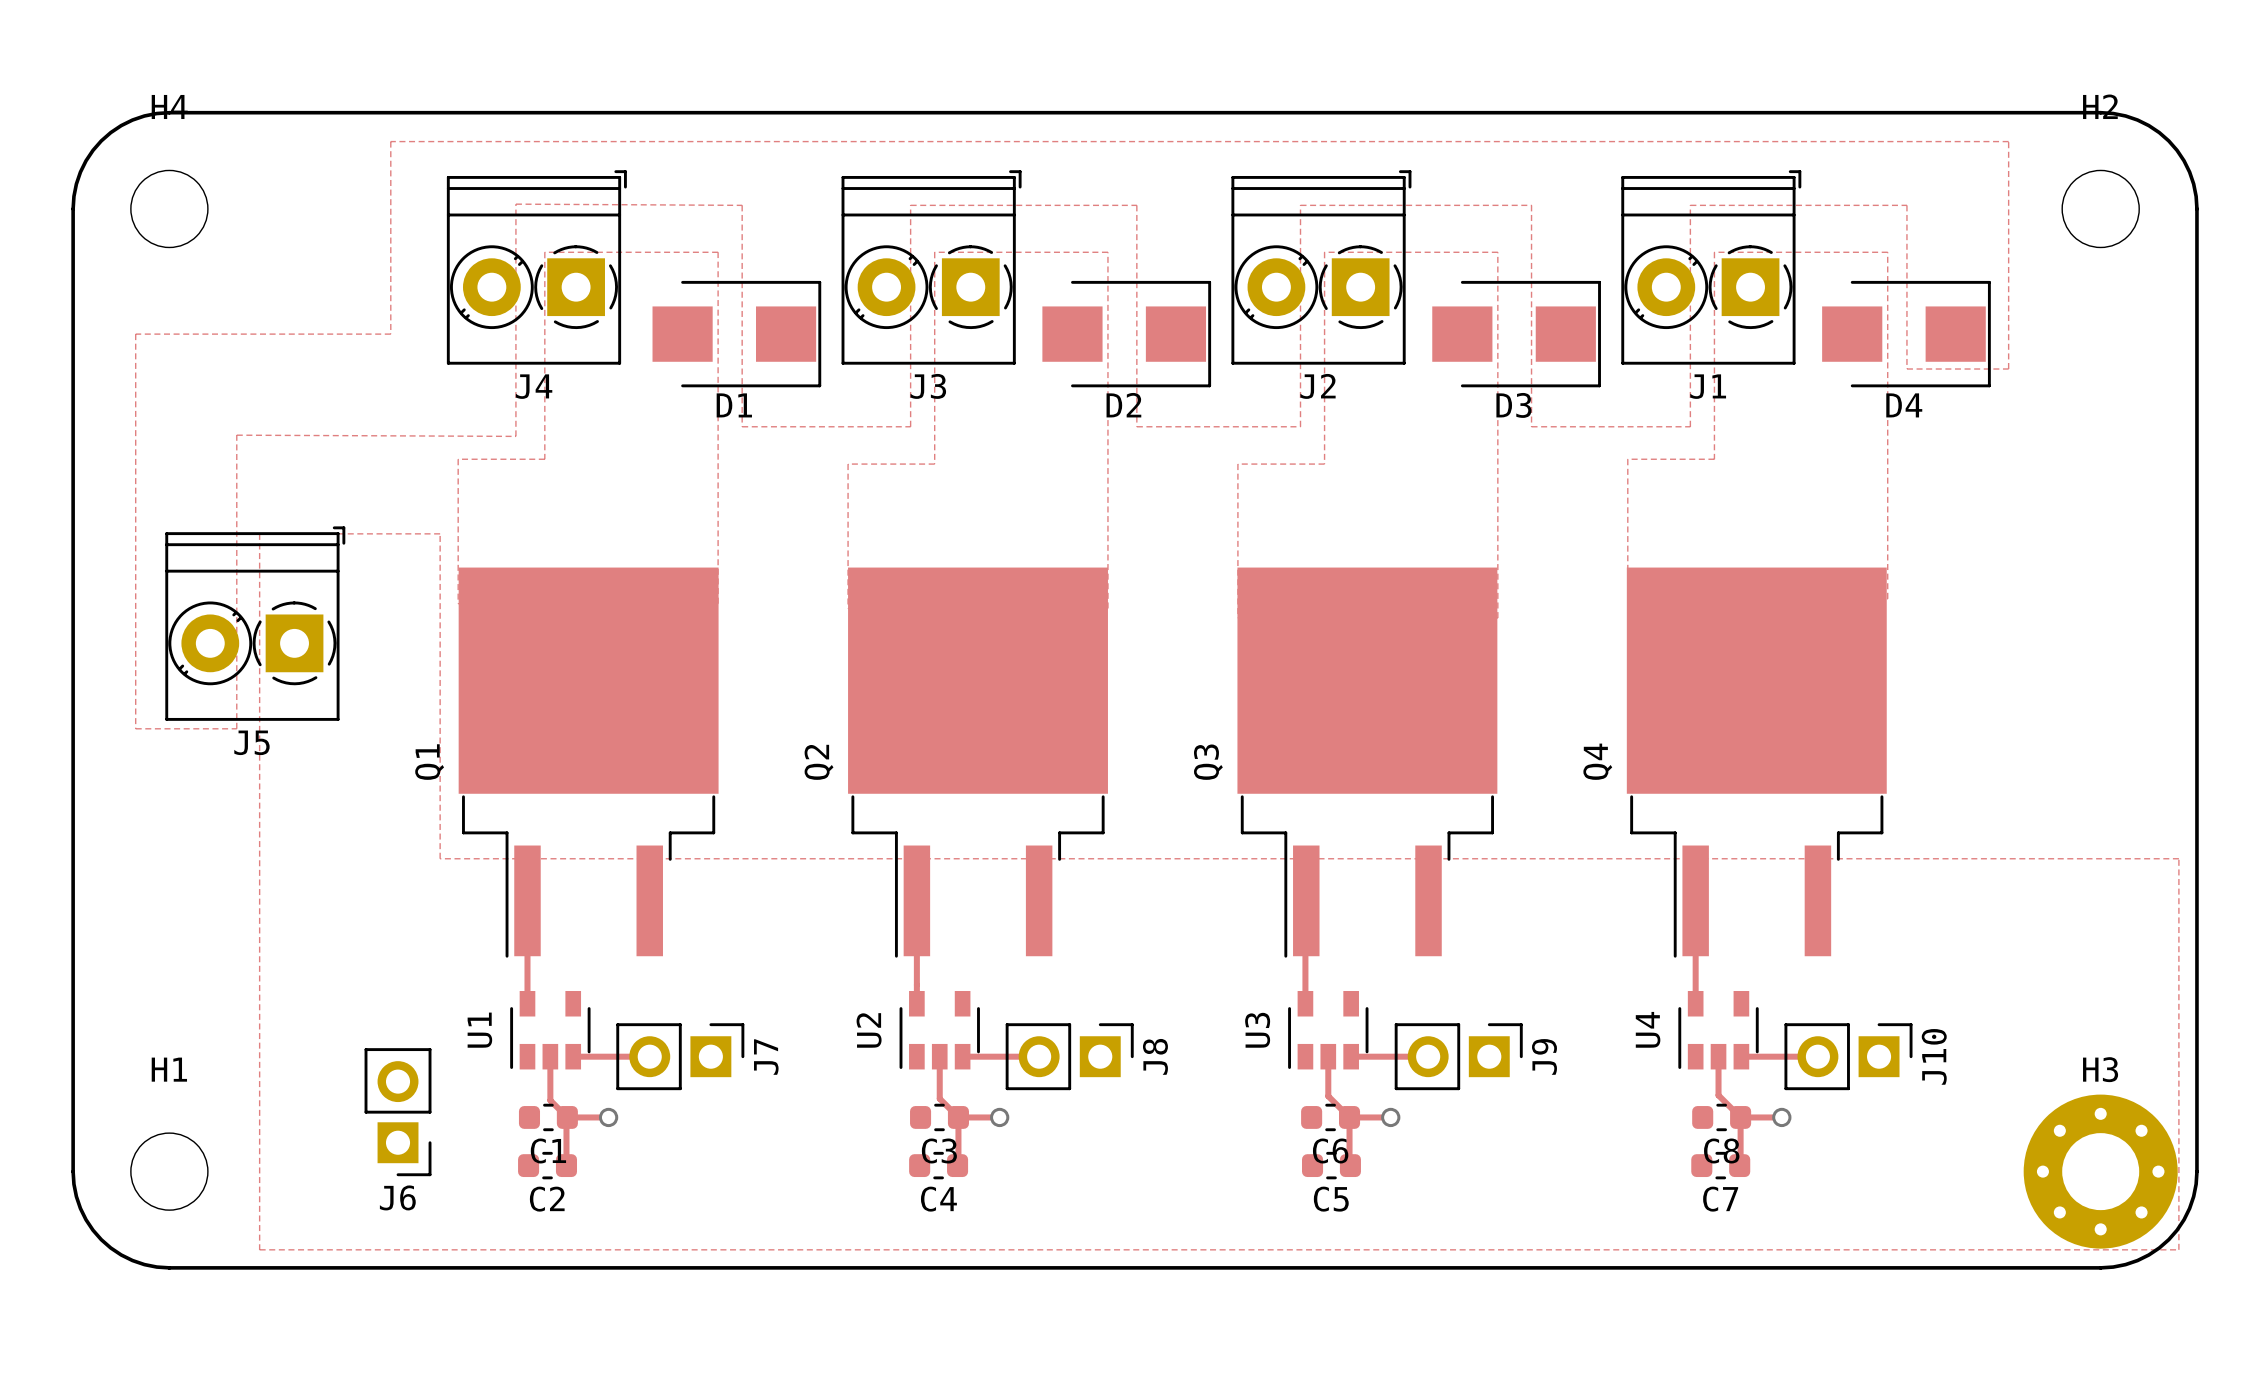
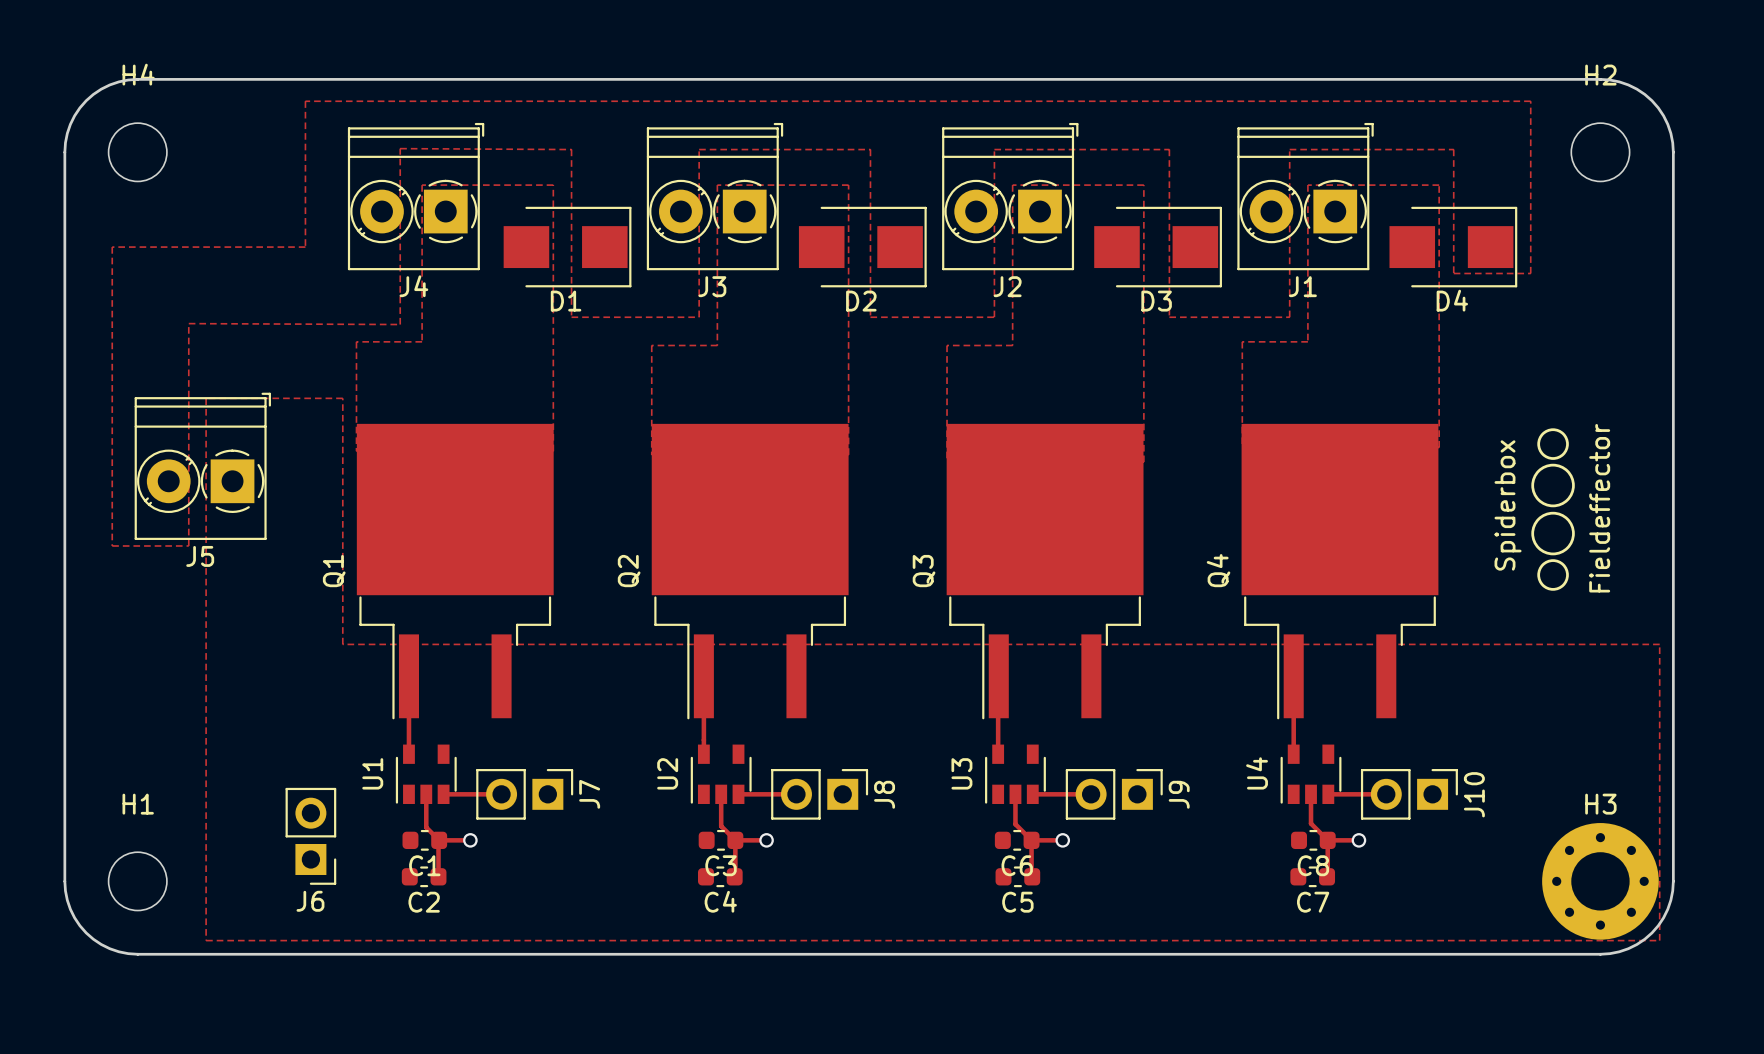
drawing: none -> [1531, 428, 1575, 591]
text: none -> Spiderbox (1508, 505)
text: none -> Fieldeffector (1599, 508)

